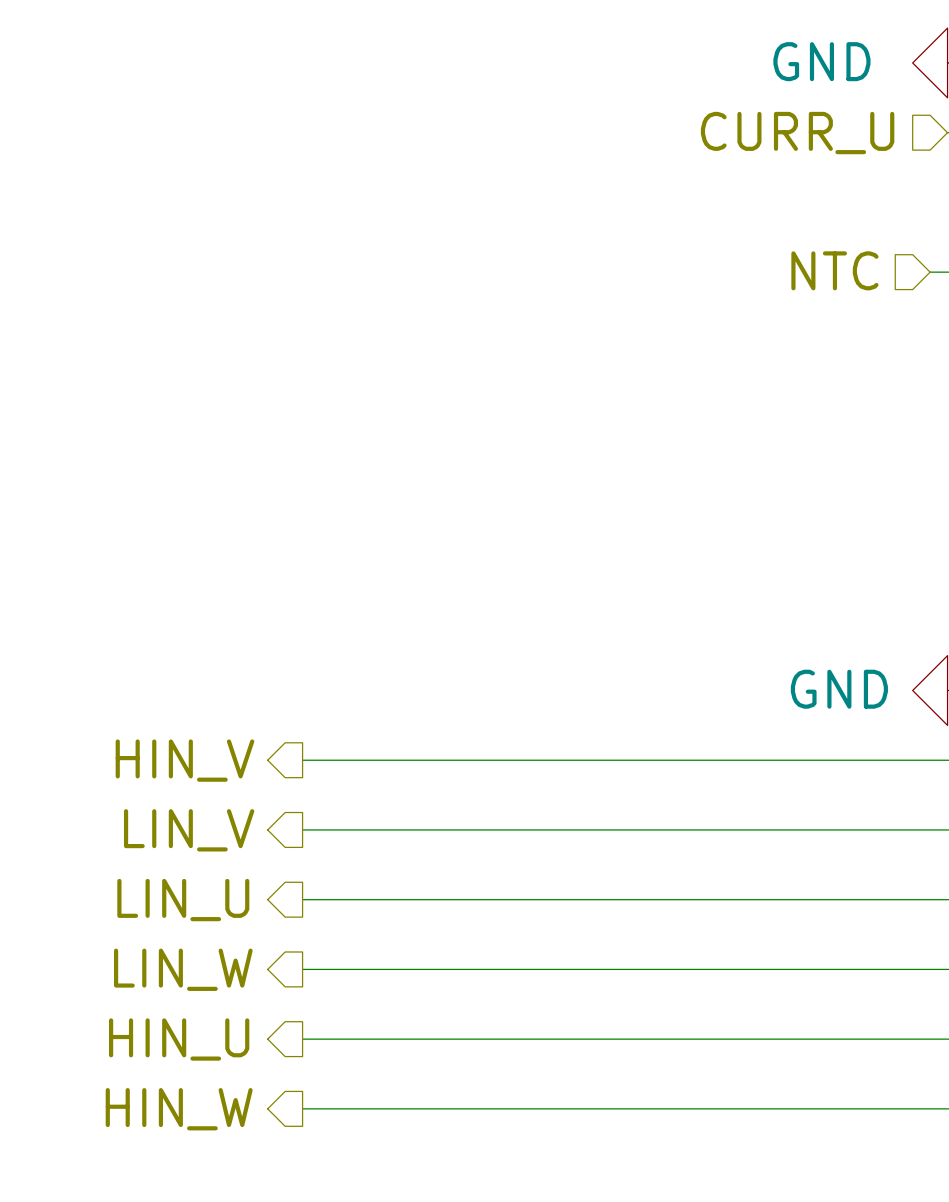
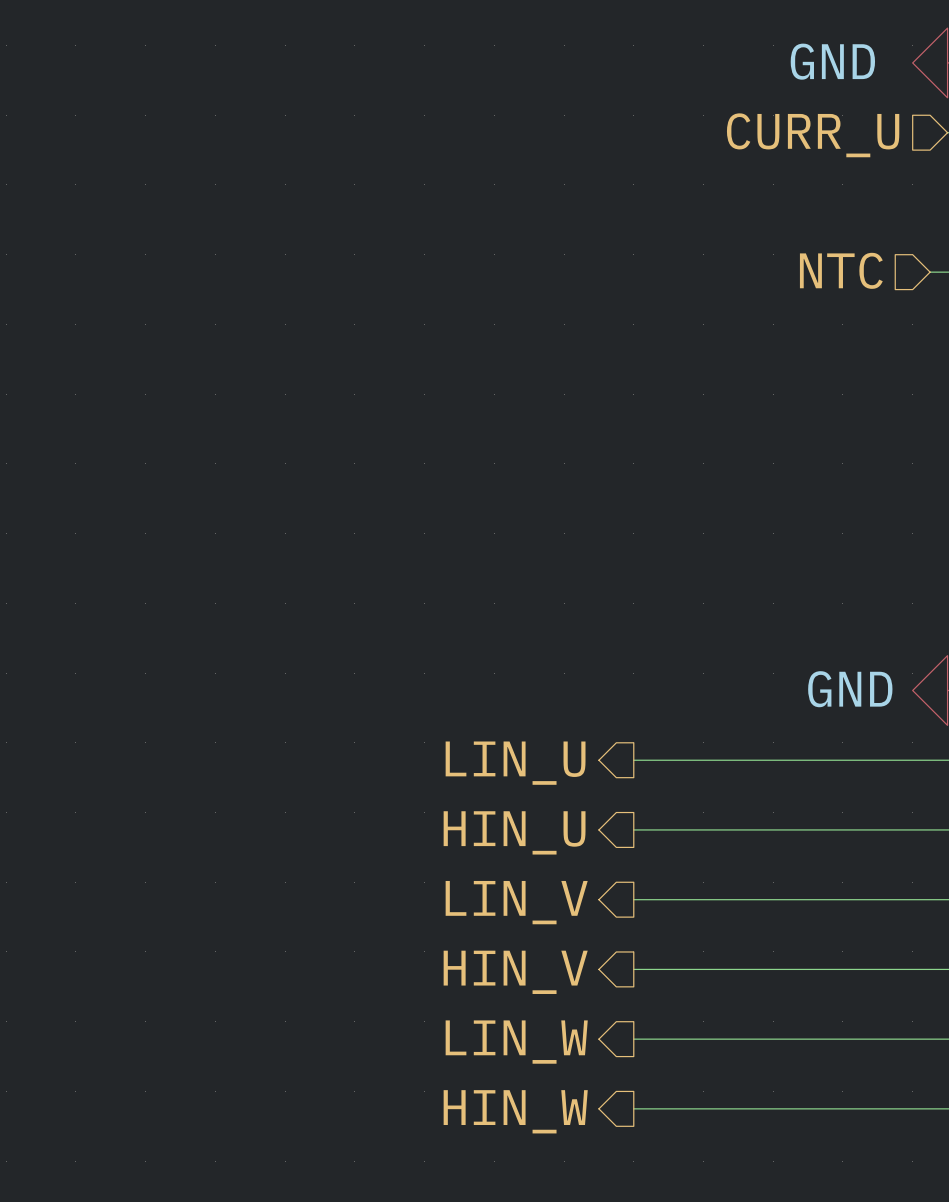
hierarchical label position: HIN_V (184, 760) -> HIN_V (515, 972)
wire: (302, 760) (633, 760) -> none
wire: (302, 829) (633, 829) -> none
hierarchical label position: LIN_V (189, 830) -> LIN_V (516, 902)
wire: (302, 899) (633, 899) -> none
hierarchical label position: LIN_U (183, 900) -> LIN_U (515, 763)
hierarchical label position: LIN_W (183, 969) -> LIN_W (516, 1042)
wire: (302, 969) (633, 969) -> none
hierarchical label position: HIN_U (179, 1039) -> HIN_U (514, 832)
wire: (302, 1039) (633, 1039) -> none
wire: (302, 1108) (633, 1108) -> none
hierarchical label position: HIN_W (179, 1109) -> HIN_W (515, 1111)

